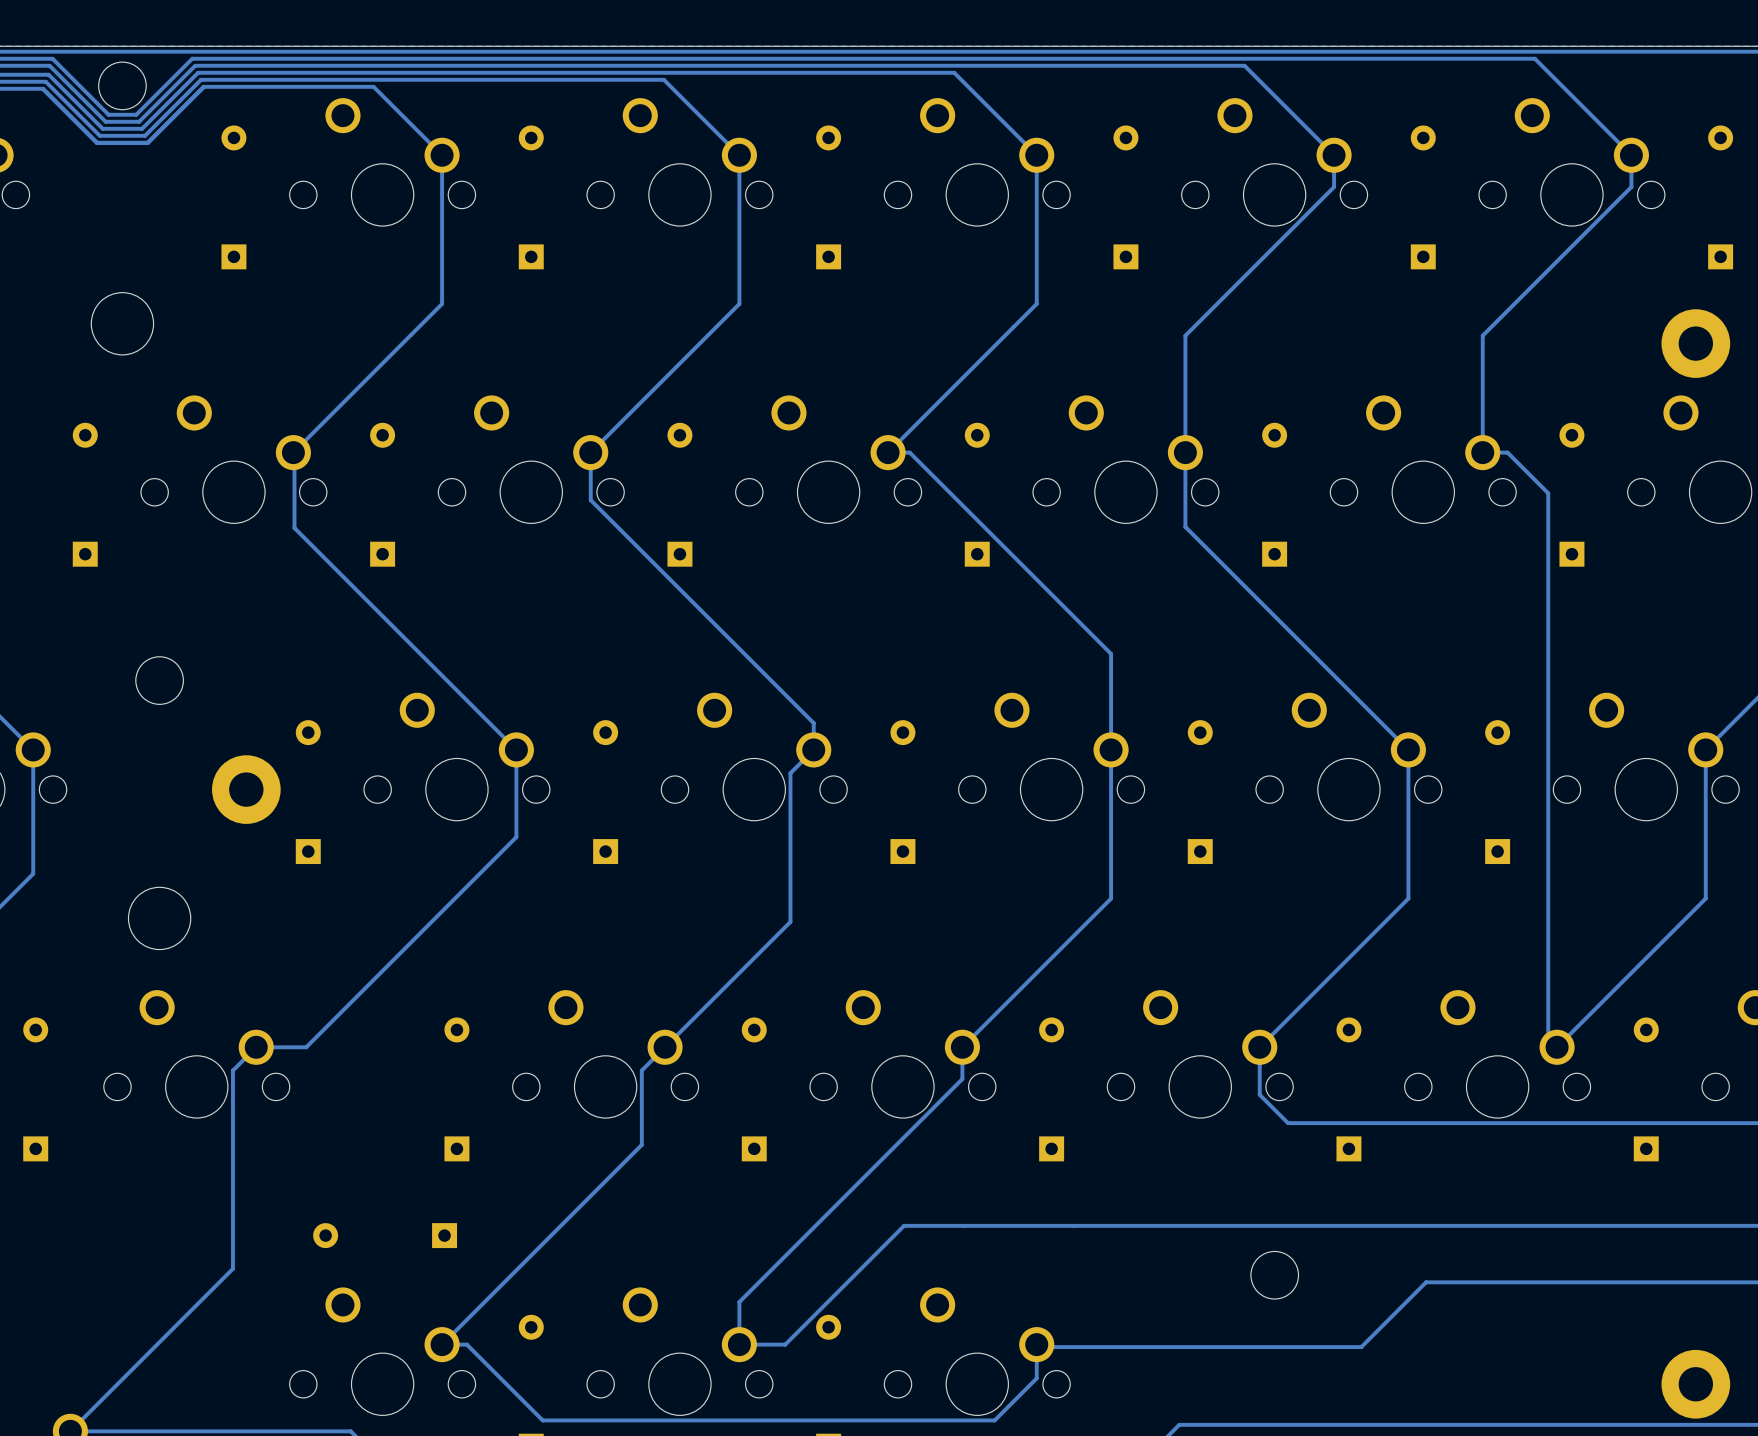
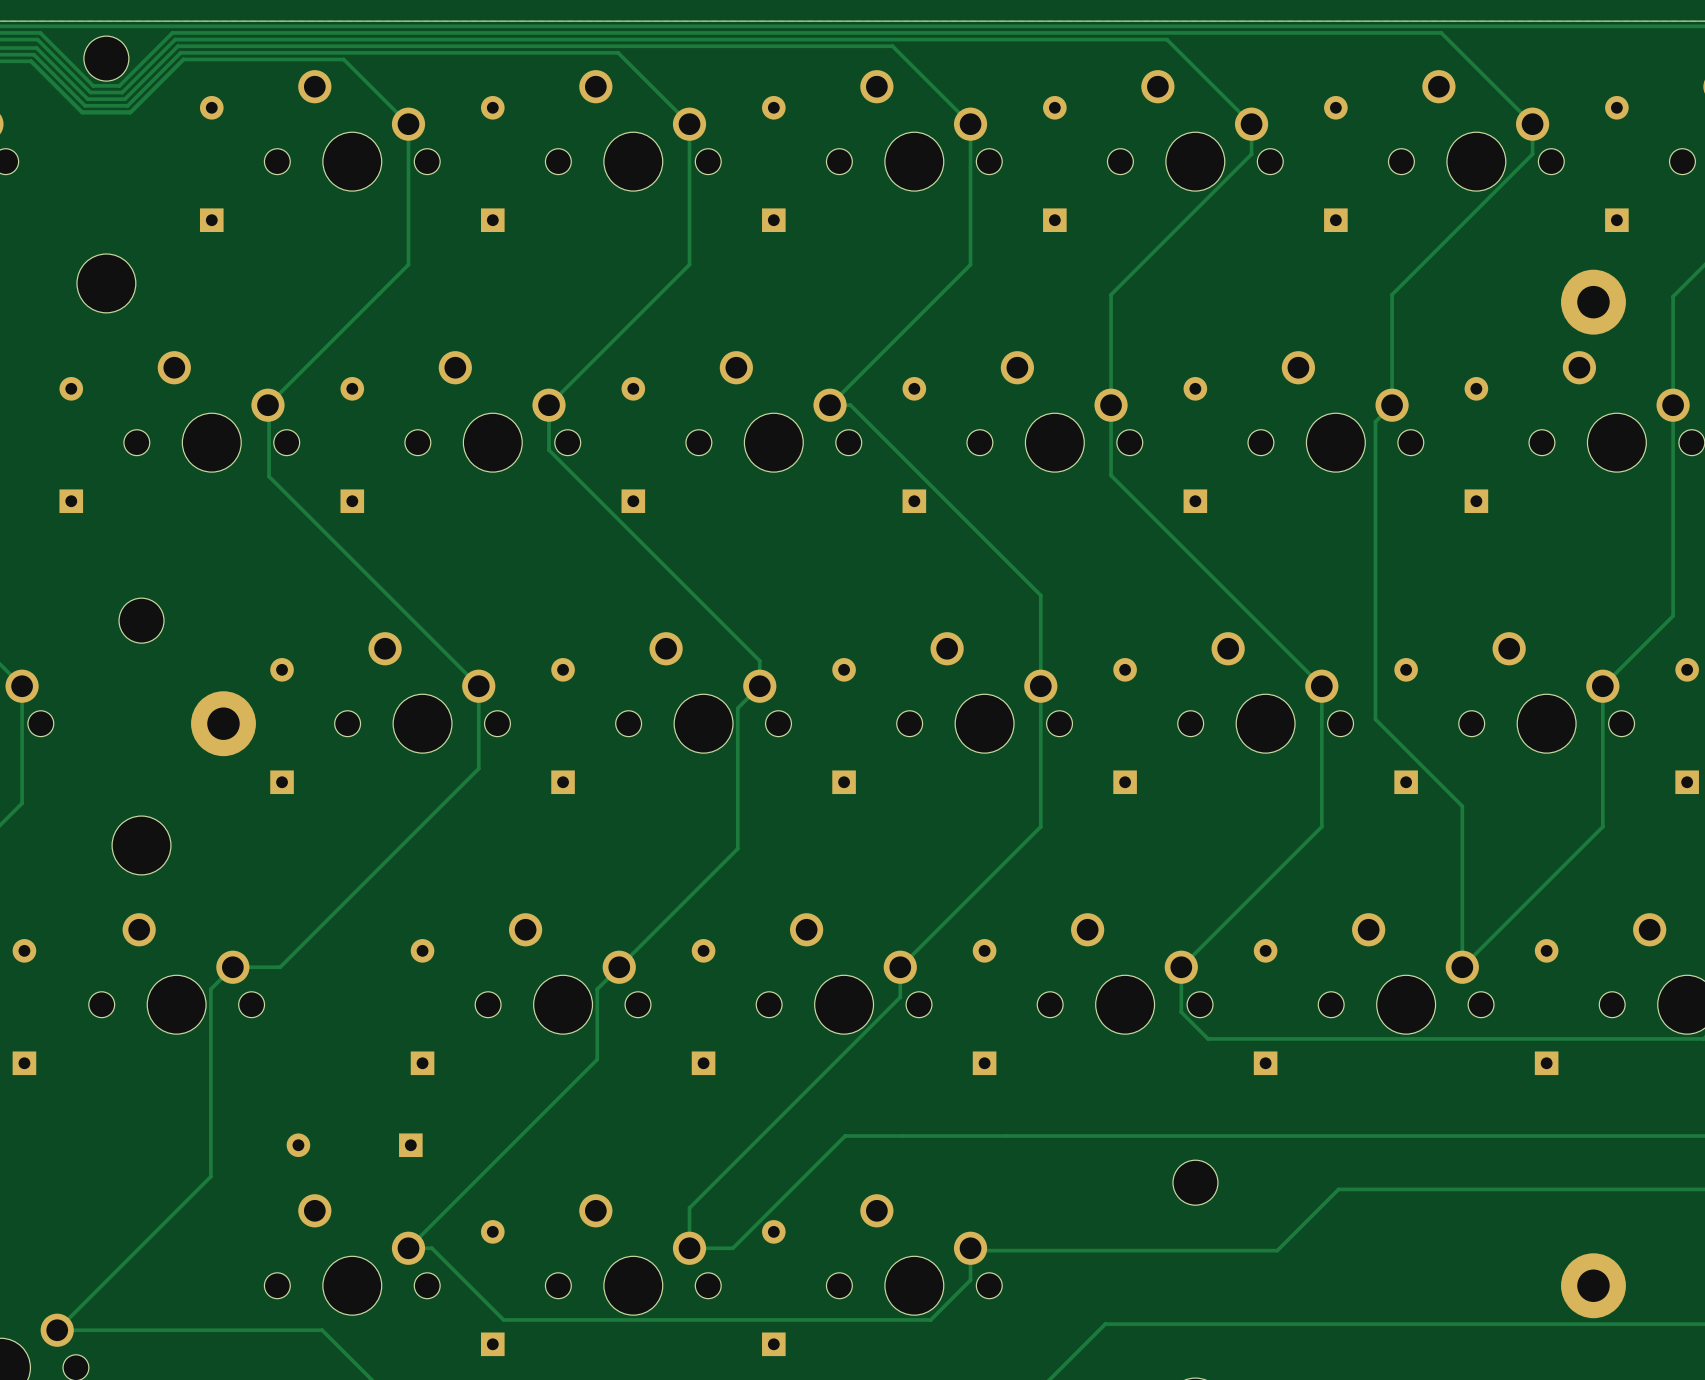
track: (1482, 452) (1507, 452) (1548, 493) (1548, 1038) (1557, 1047) -> (1392, 405) (1375, 421) (1375, 719) (1462, 806) (1462, 967)

